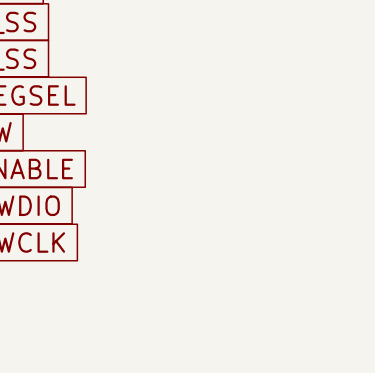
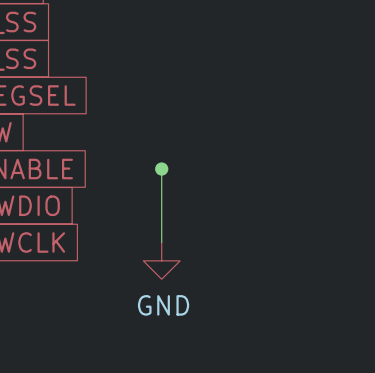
wire: none -> (161, 169) (161, 242)
junction: none -> (161, 169)
power symbol: none -> GND (161, 260)

